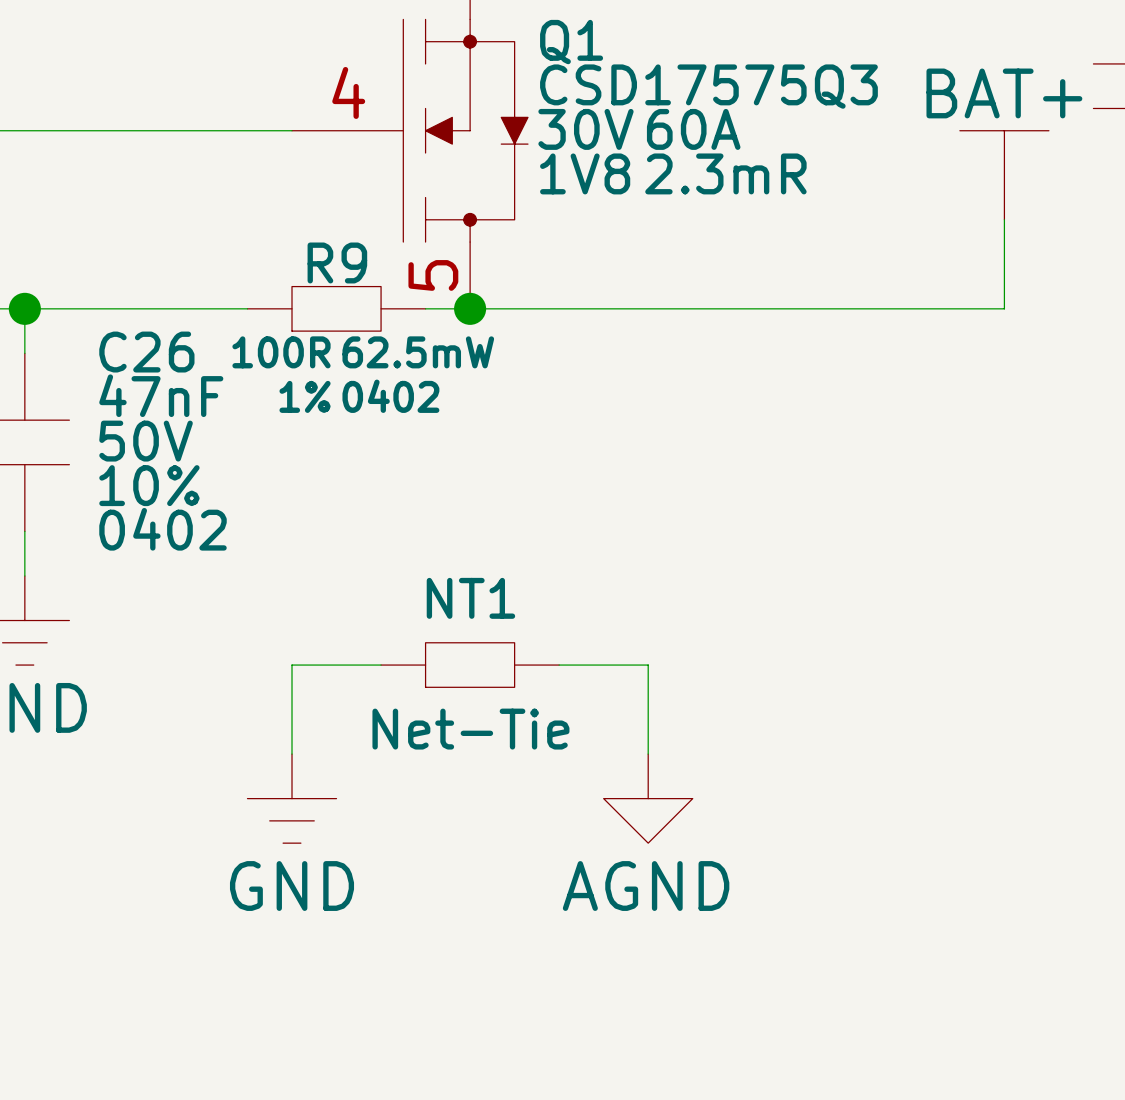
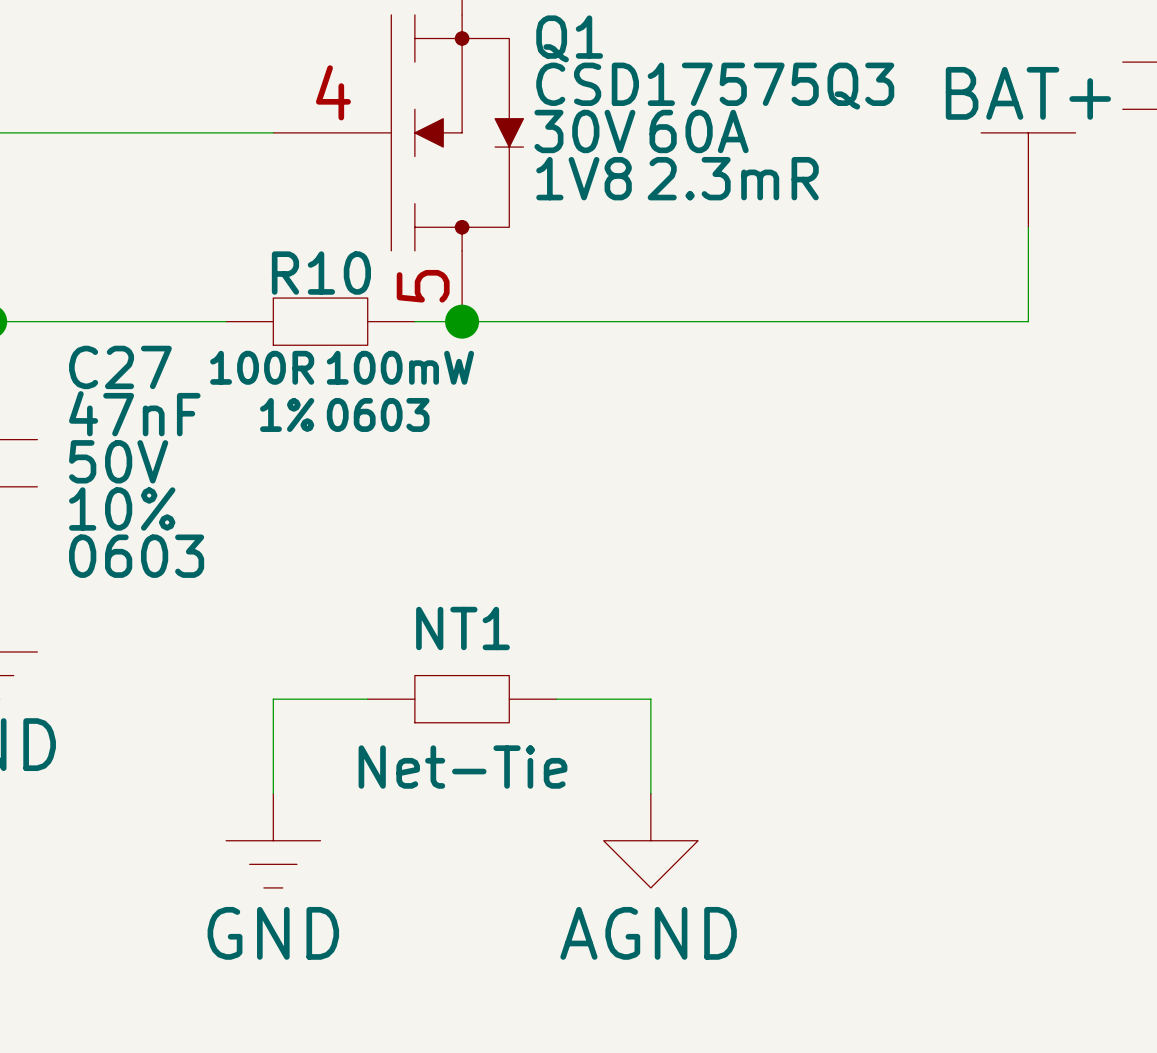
R9 name: R9 (337, 262) -> R10 (321, 273)
C26 name: C26 (146, 352) -> C27 (120, 367)
R9 text: 62.5mW (418, 352) -> 100mW (400, 367)
R9 text: 0402 (390, 396) -> 0603 (378, 414)
C26 text: 0402 (163, 529) -> 0603 (136, 556)

